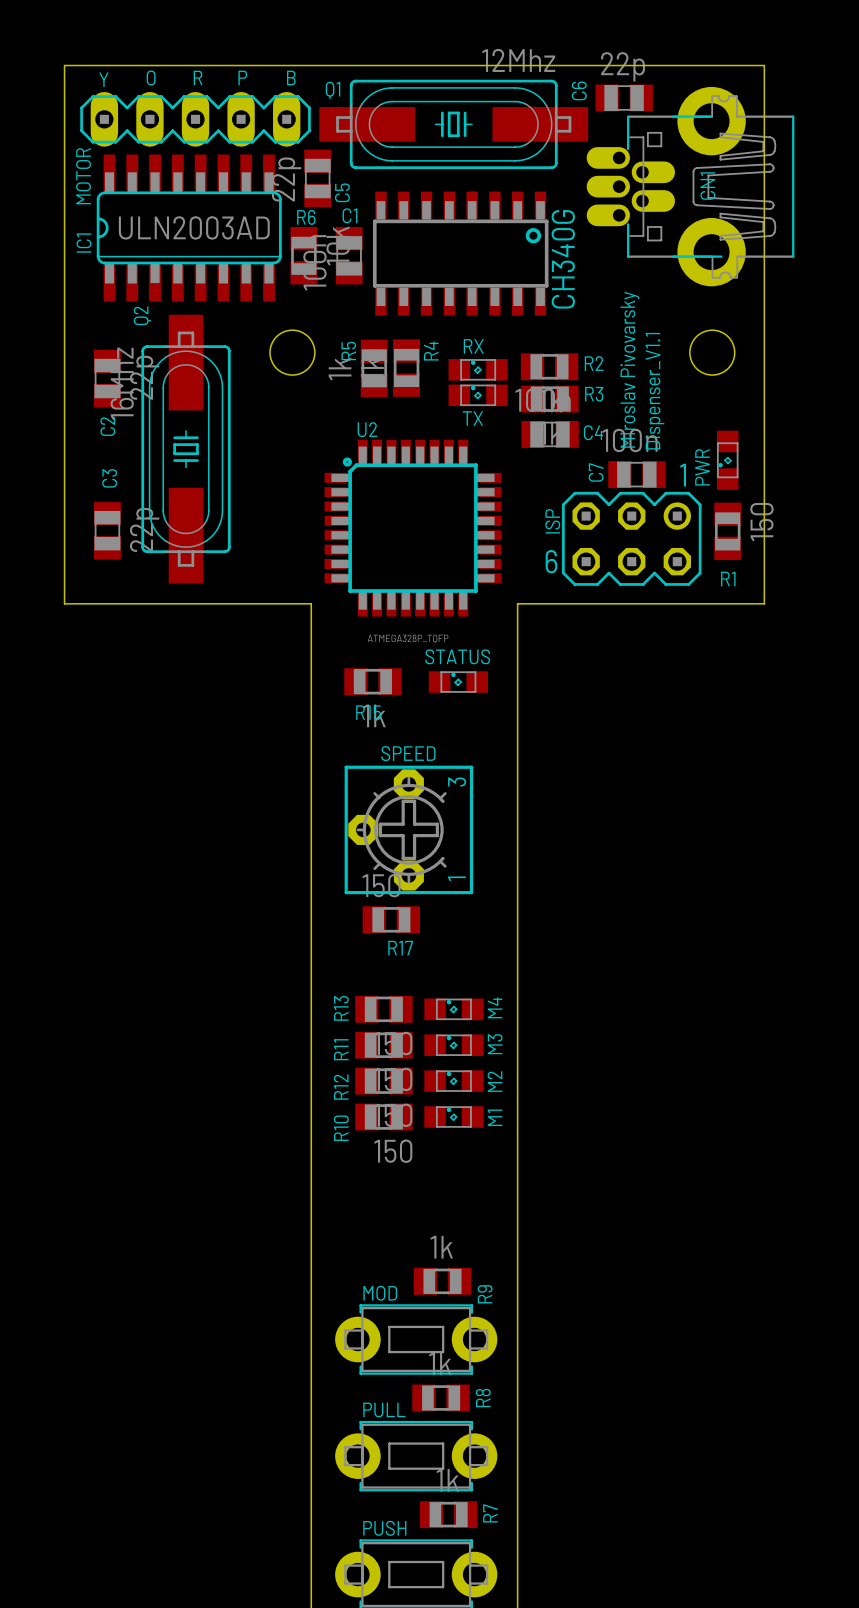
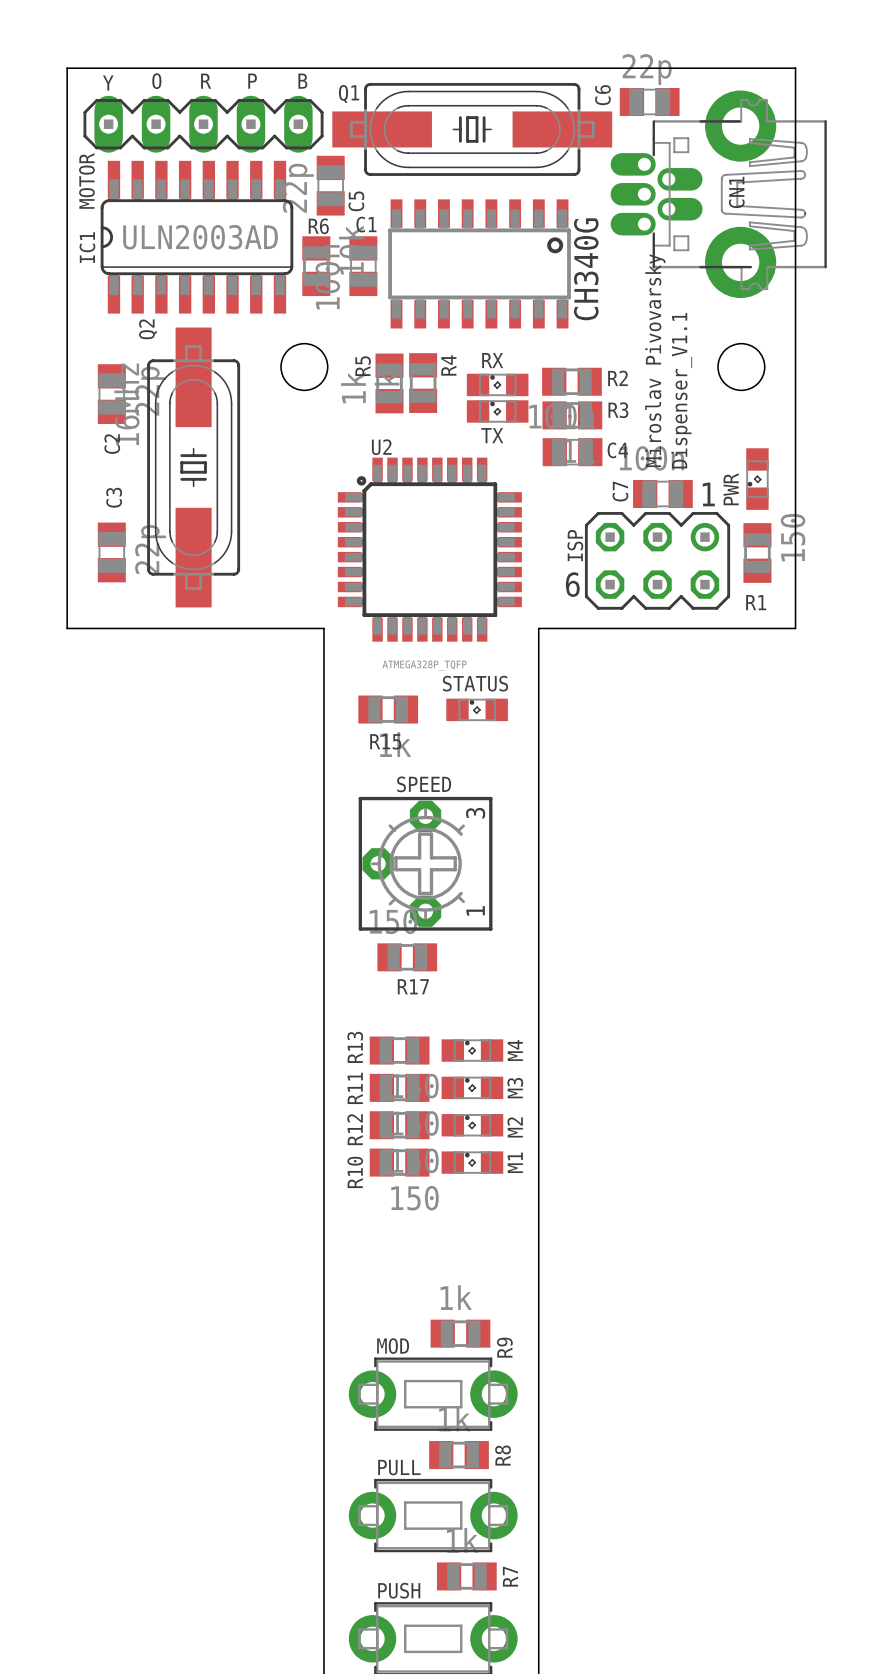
Q1 value: 12Mhz (518, 60) -> none

